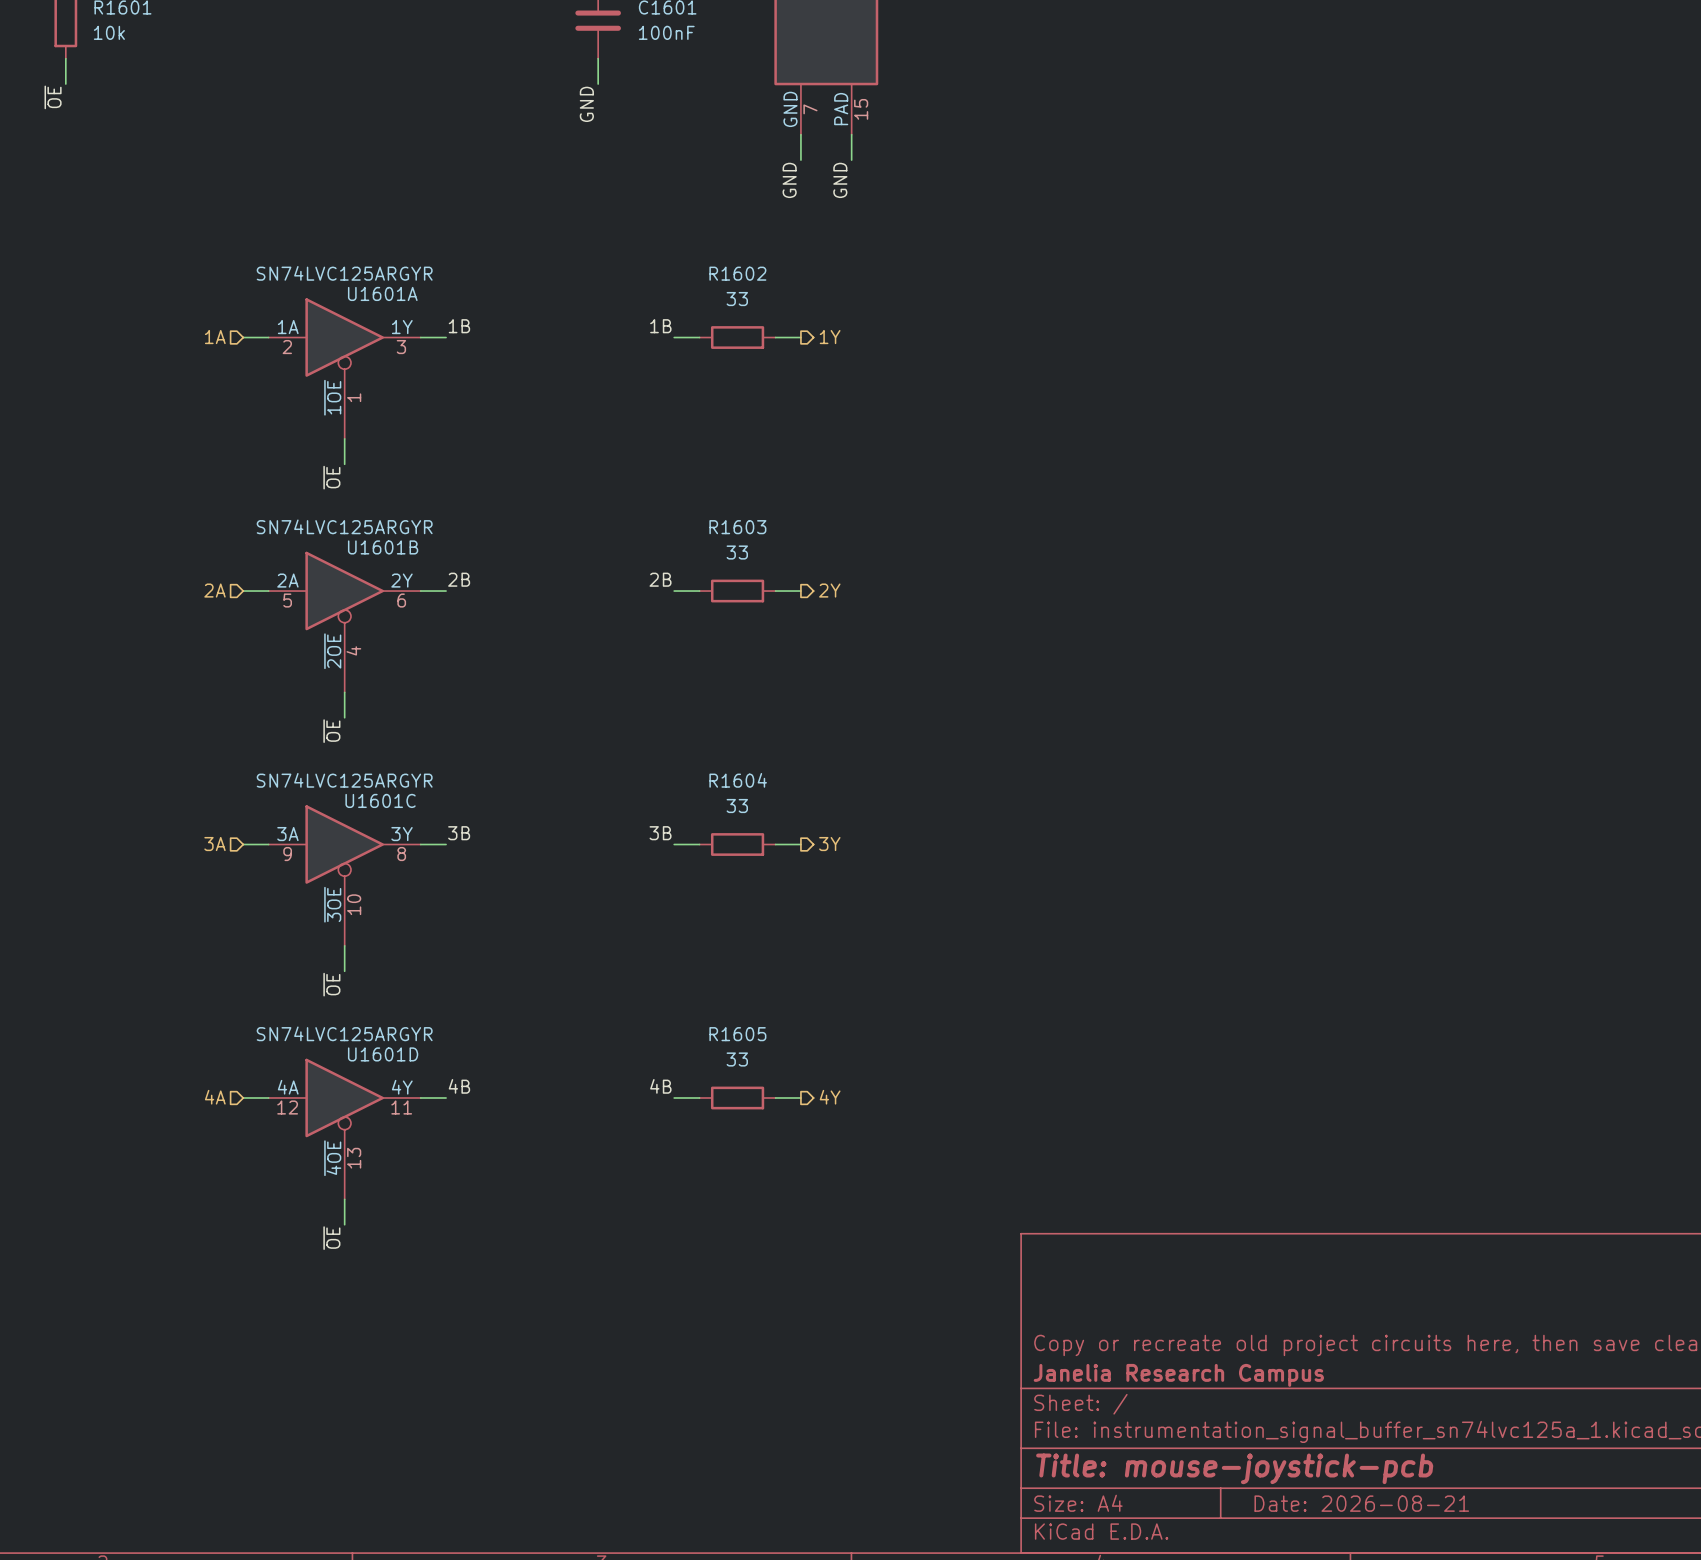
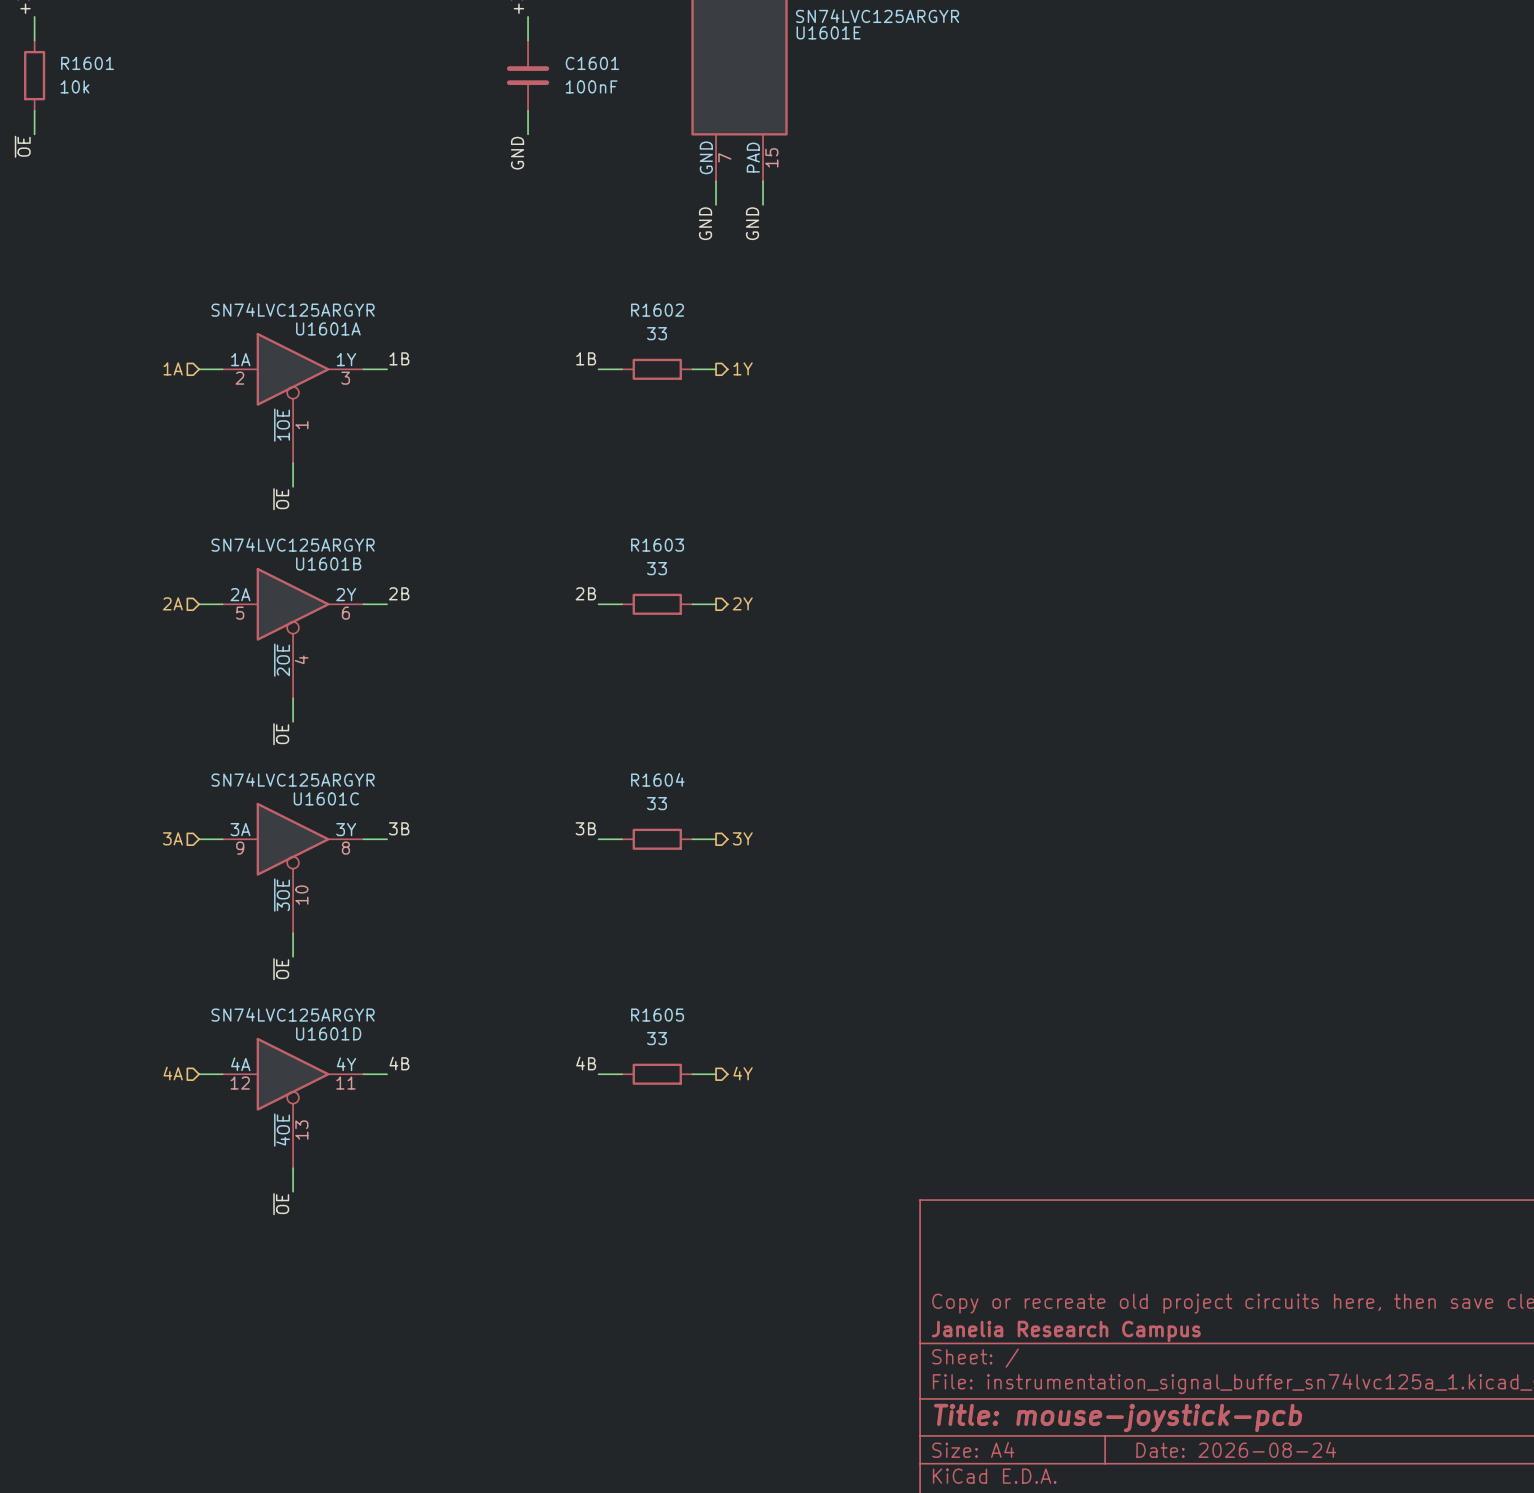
title block: Date: 2026-08-21 (1361, 1503) -> Date: 2026-08-24 (1236, 1449)

